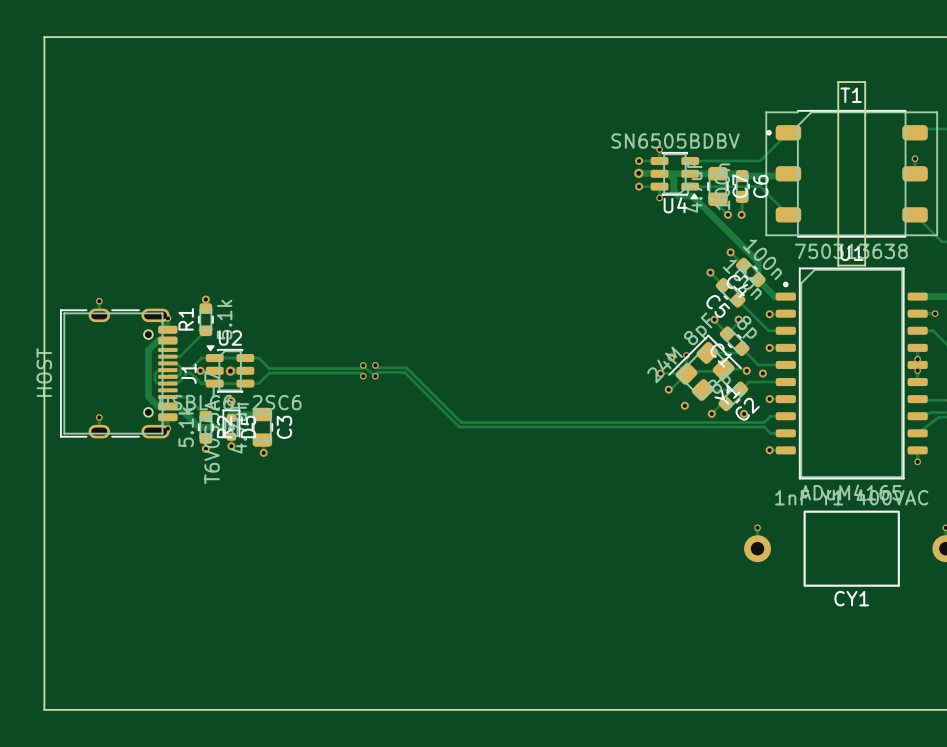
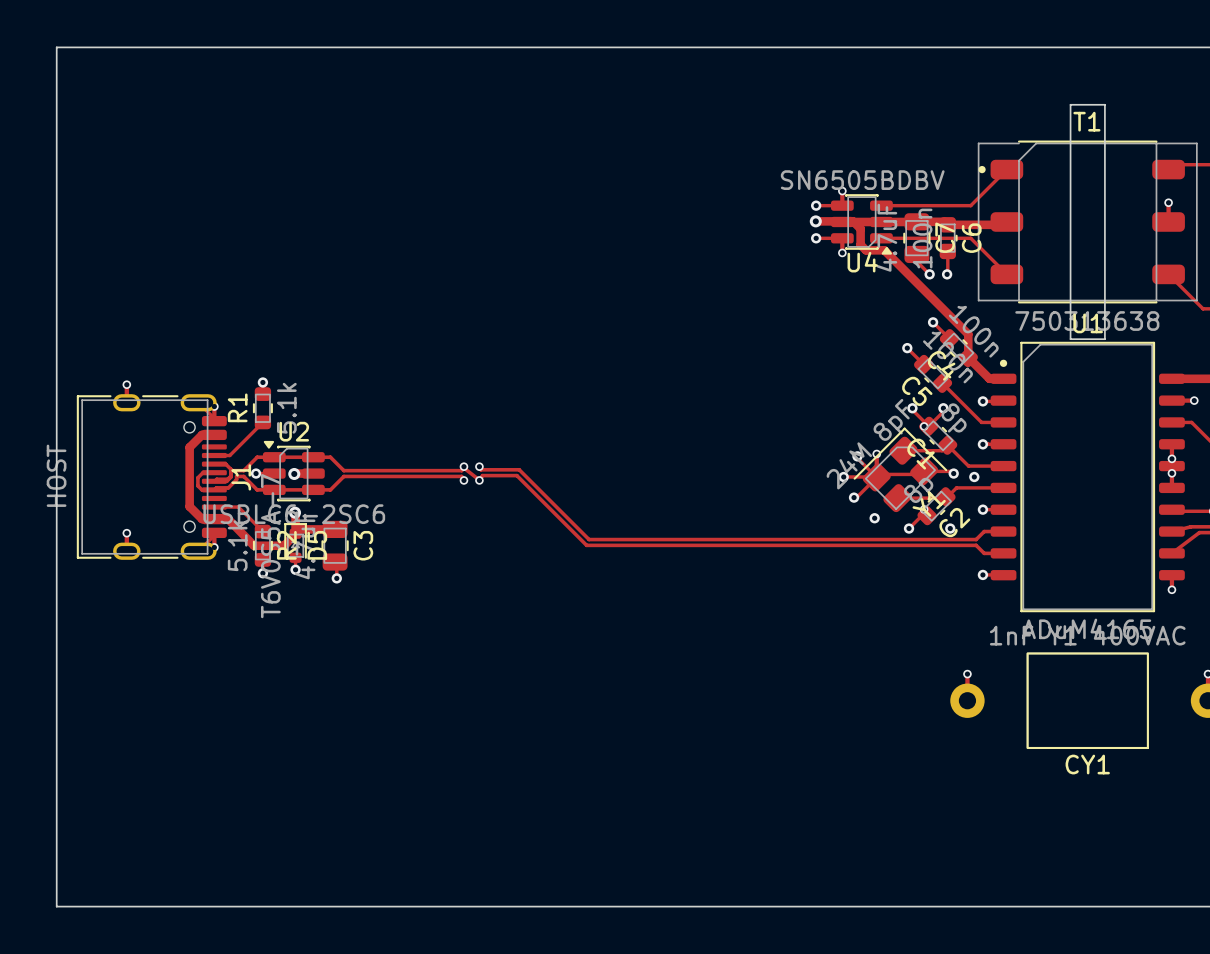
via: none -> (924, 426)

